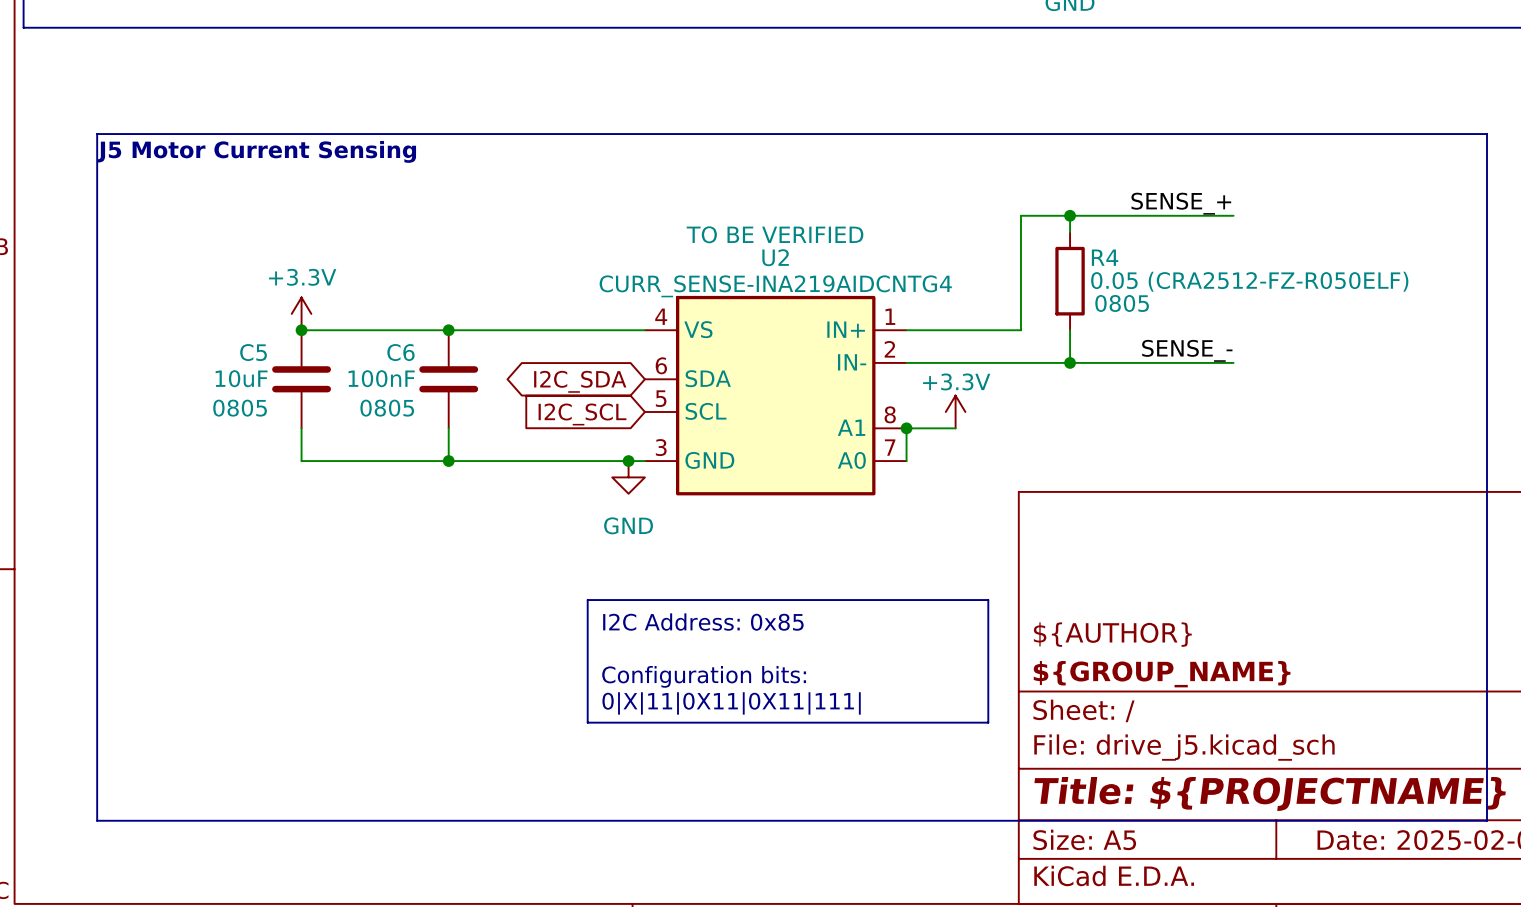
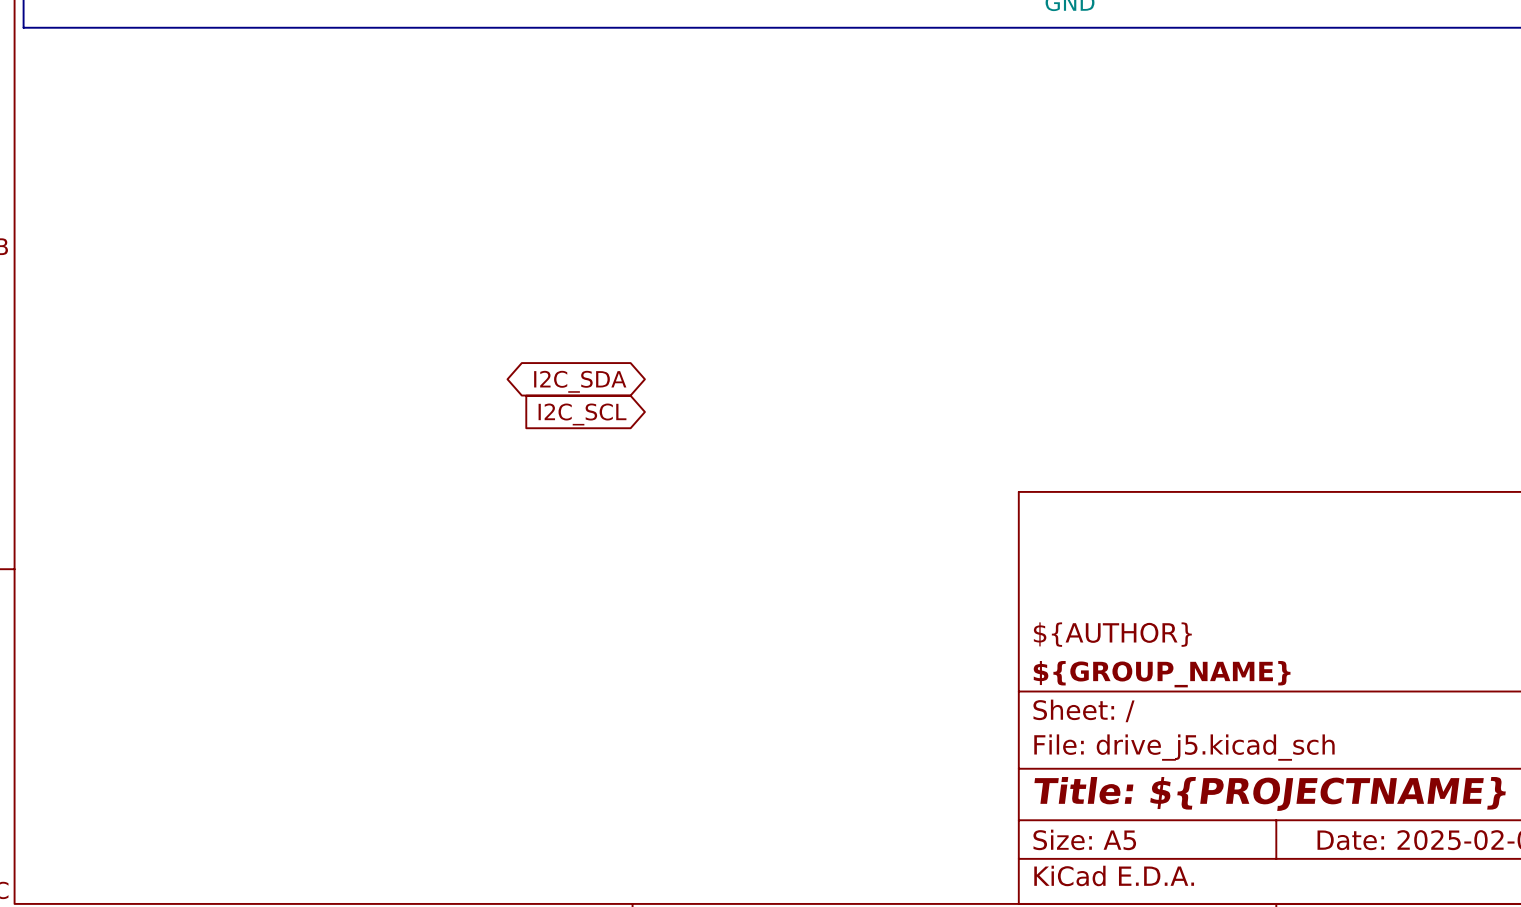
line: (97, 134) (1487, 134) (1487, 820) (97, 820) (97, 134) -> none
text: J5 Motor Current Sensing (256, 151) -> none
label: SENSE_+ (1181, 203) -> none
wire: (1070, 215) (1070, 232) -> none
junction: (1070, 215) -> none
wire: (1233, 215) (1021, 215) (1021, 330) (906, 330) -> none
R4: 0.05 (CRA2512-FZ-R050ELF) (1070, 281) -> none
power symbol: +3.3V (301, 313) -> none
wire: (301, 330) (644, 330) -> none
junction: (301, 330) -> none
junction: (448, 330) -> none
wire: (1070, 330) (1070, 362) -> none
label: SENSE_- (1187, 350) -> none
wire: (906, 362) (1233, 362) -> none
junction: (1070, 362) -> none
C5: 10uF (301, 379) -> none
C6: 100nF (448, 379) -> none
U2: CURR_SENSE-INA219AIDCNTG4 (775, 395) -> none
power symbol: +3.3V (955, 411) -> none
wire: (301, 428) (301, 461) (644, 461) -> none
wire: (448, 428) (448, 461) -> none
junction: (906, 428) -> none
wire: (955, 428) (906, 428) (906, 461) -> none
junction: (448, 461) -> none
junction: (628, 461) -> none
power symbol: GND (628, 477) -> none
line: (587, 600) (988, 600) (988, 722) (587, 722) (587, 600) -> none
text: I2C Address: 0x85 (703, 622) -> none
text: Configuration bits: (704, 676) -> none
text: 0|X|11|0X11|0X11|111| (731, 703) -> none

